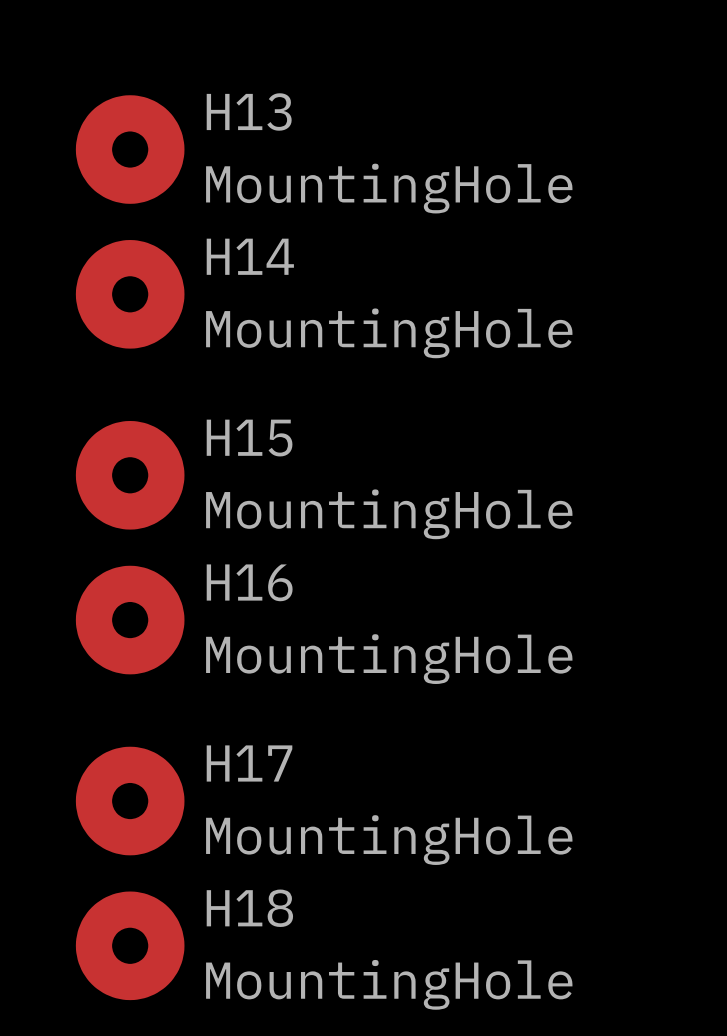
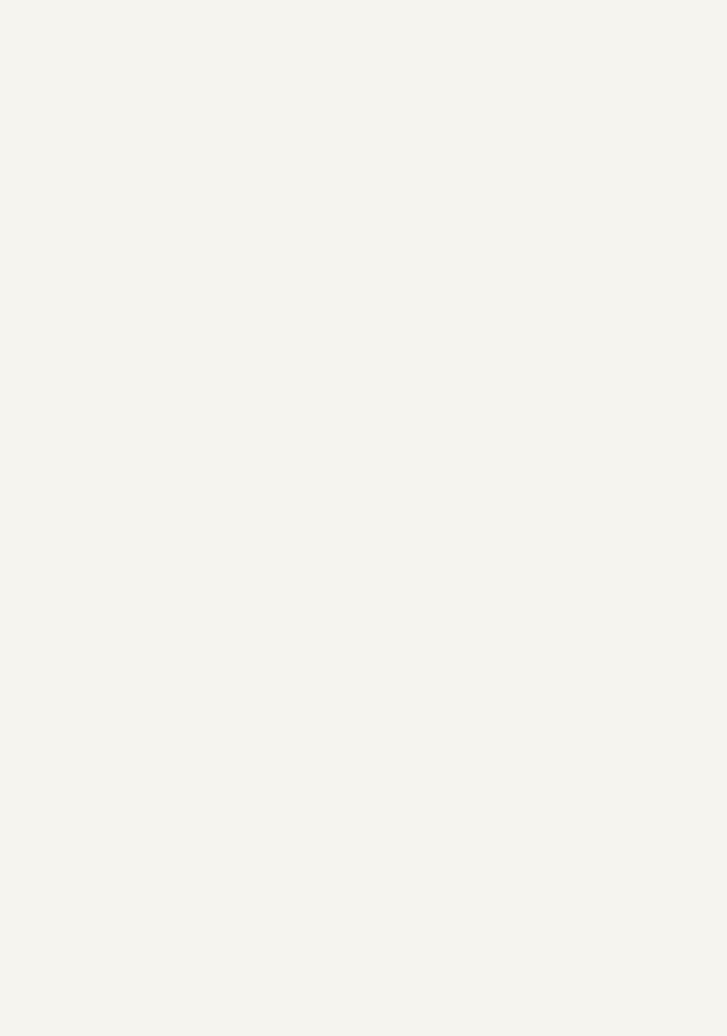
H13: MountingHole (130, 149) -> none
H14: MountingHole (130, 294) -> none
H15: MountingHole (130, 475) -> none
H16: MountingHole (130, 620) -> none
H17: MountingHole (130, 801) -> none
H18: MountingHole (130, 945) -> none

